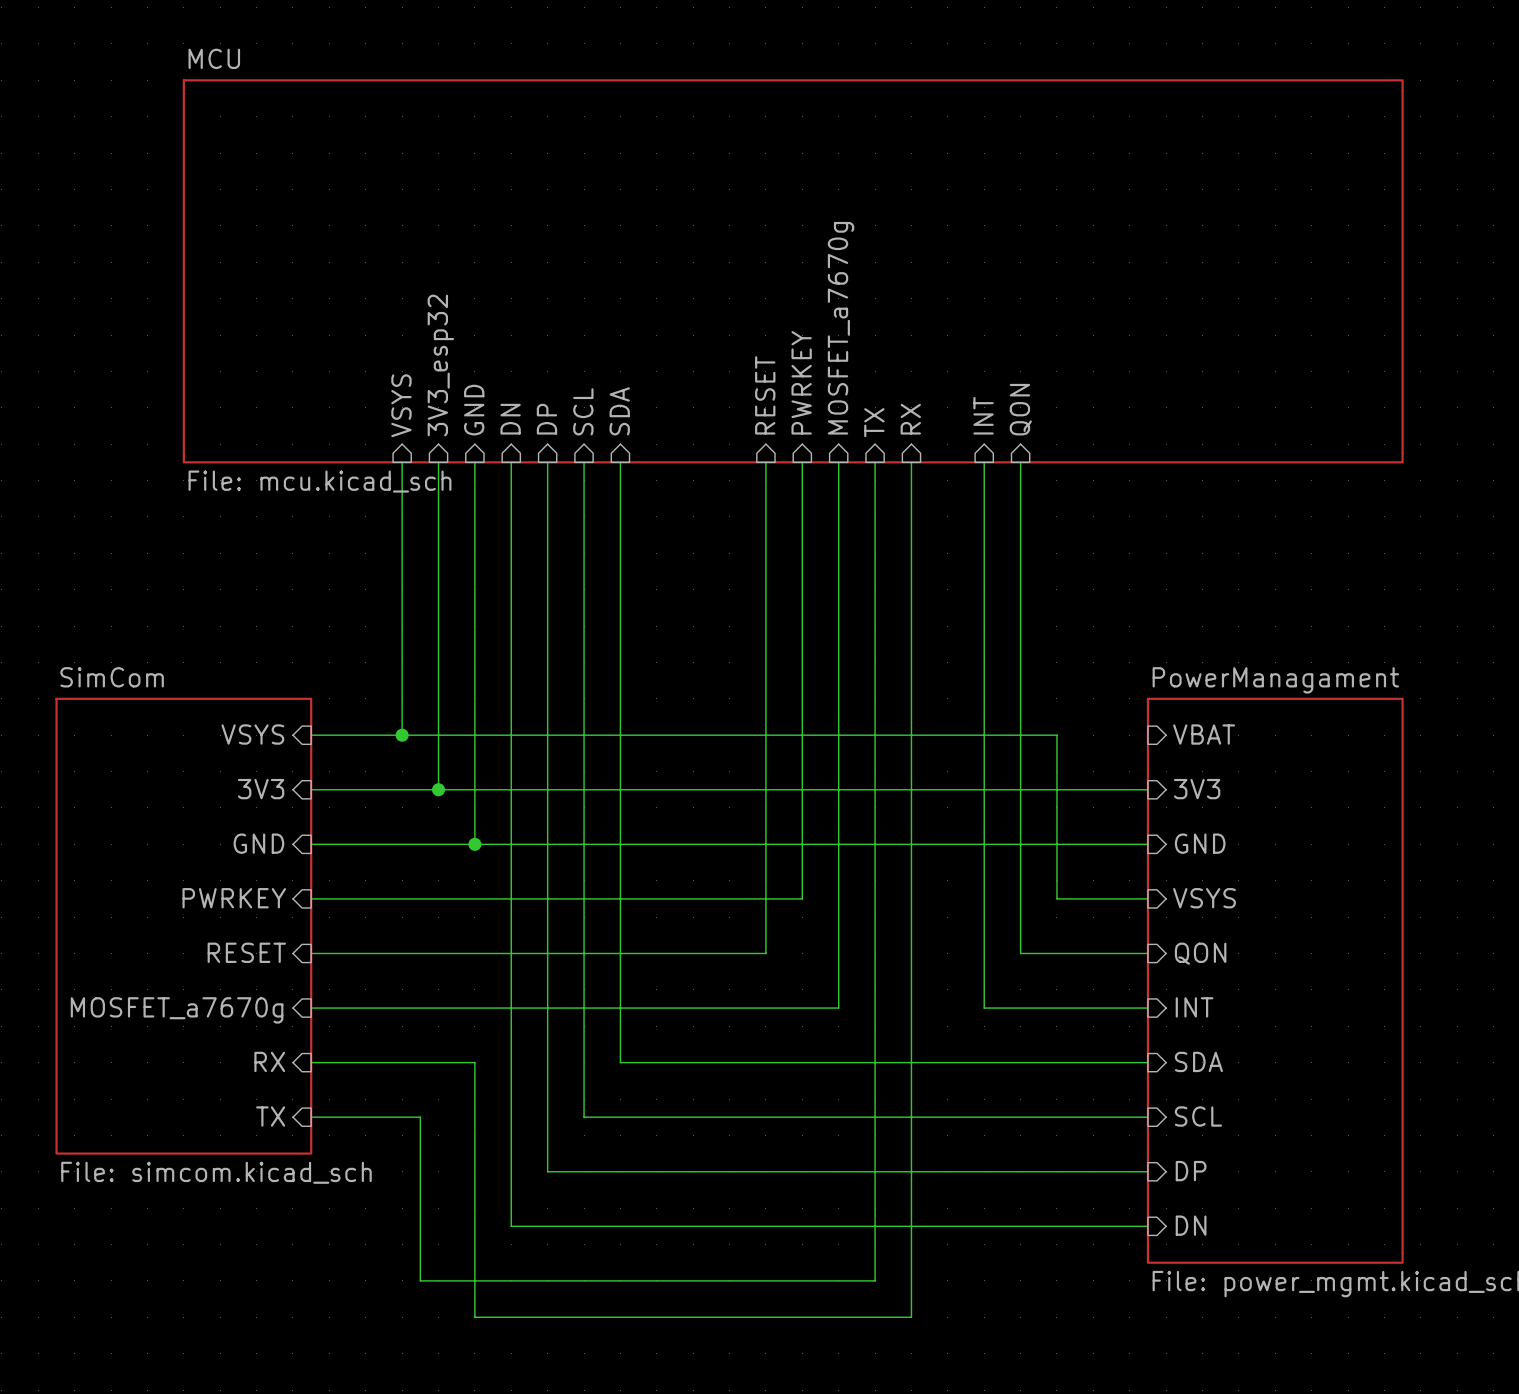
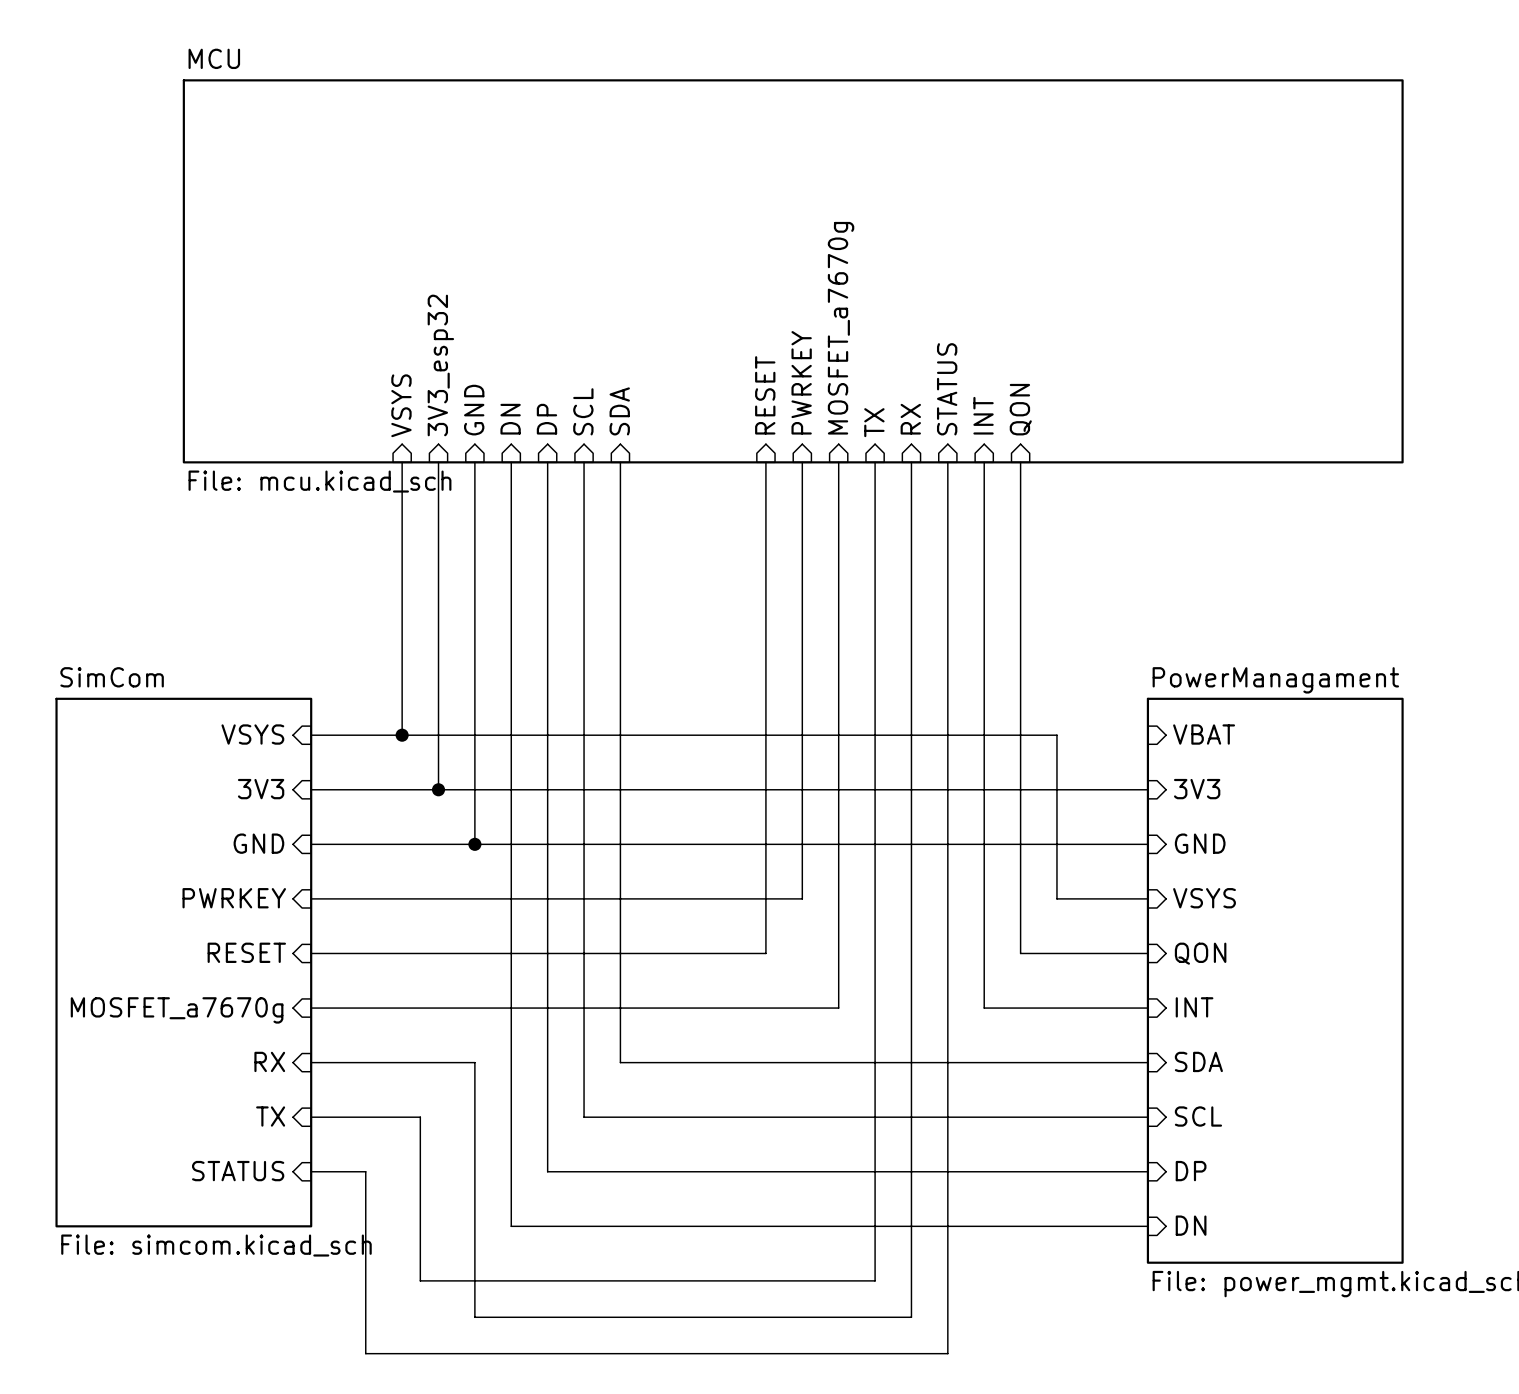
sheet pin: none -> STATUS (947, 389)
wire: none -> (947, 462) (947, 1353) (365, 1353) (365, 1171) (311, 1171)
sheet SimCom: File: simcom.kicad_sch (183, 926) -> none
sheet SimCom: none -> File: simcom.kicad_sch (183, 962)
sheet pin: none -> STATUS (238, 1171)

